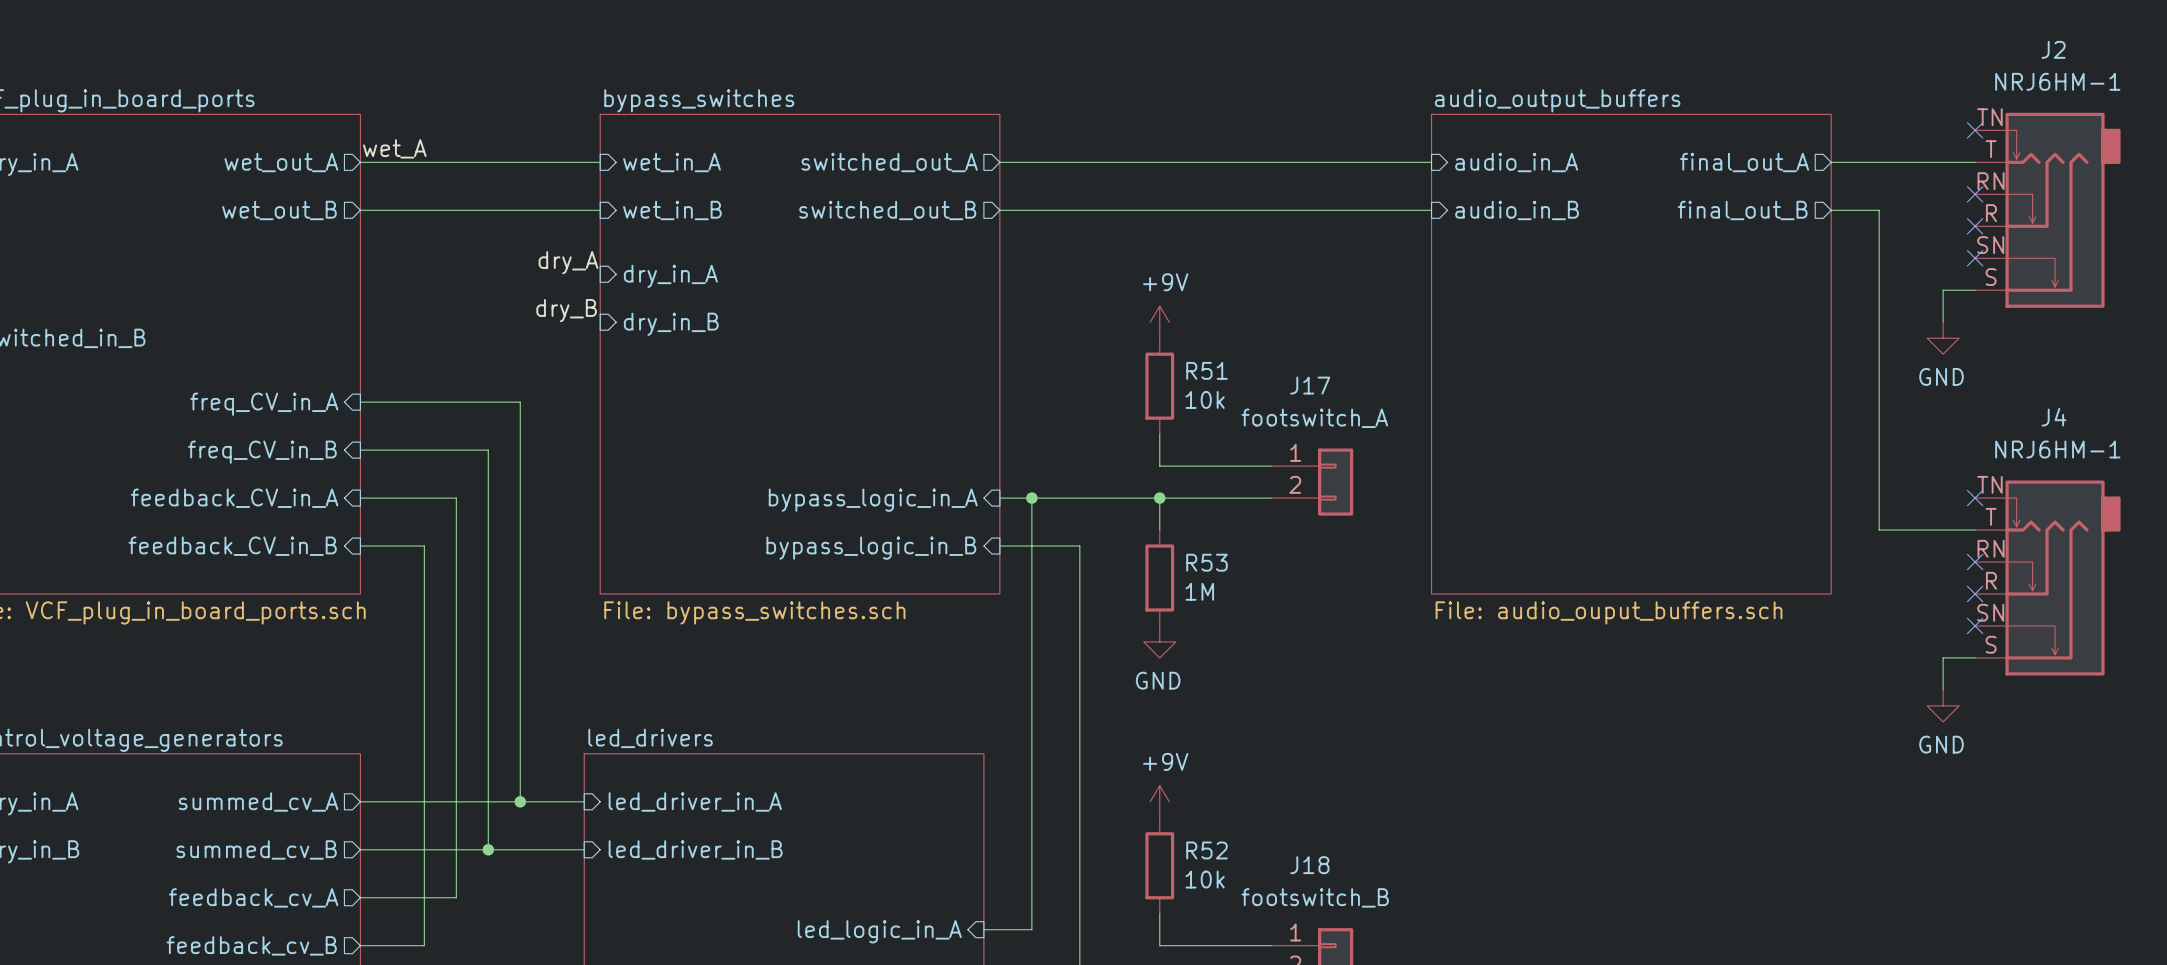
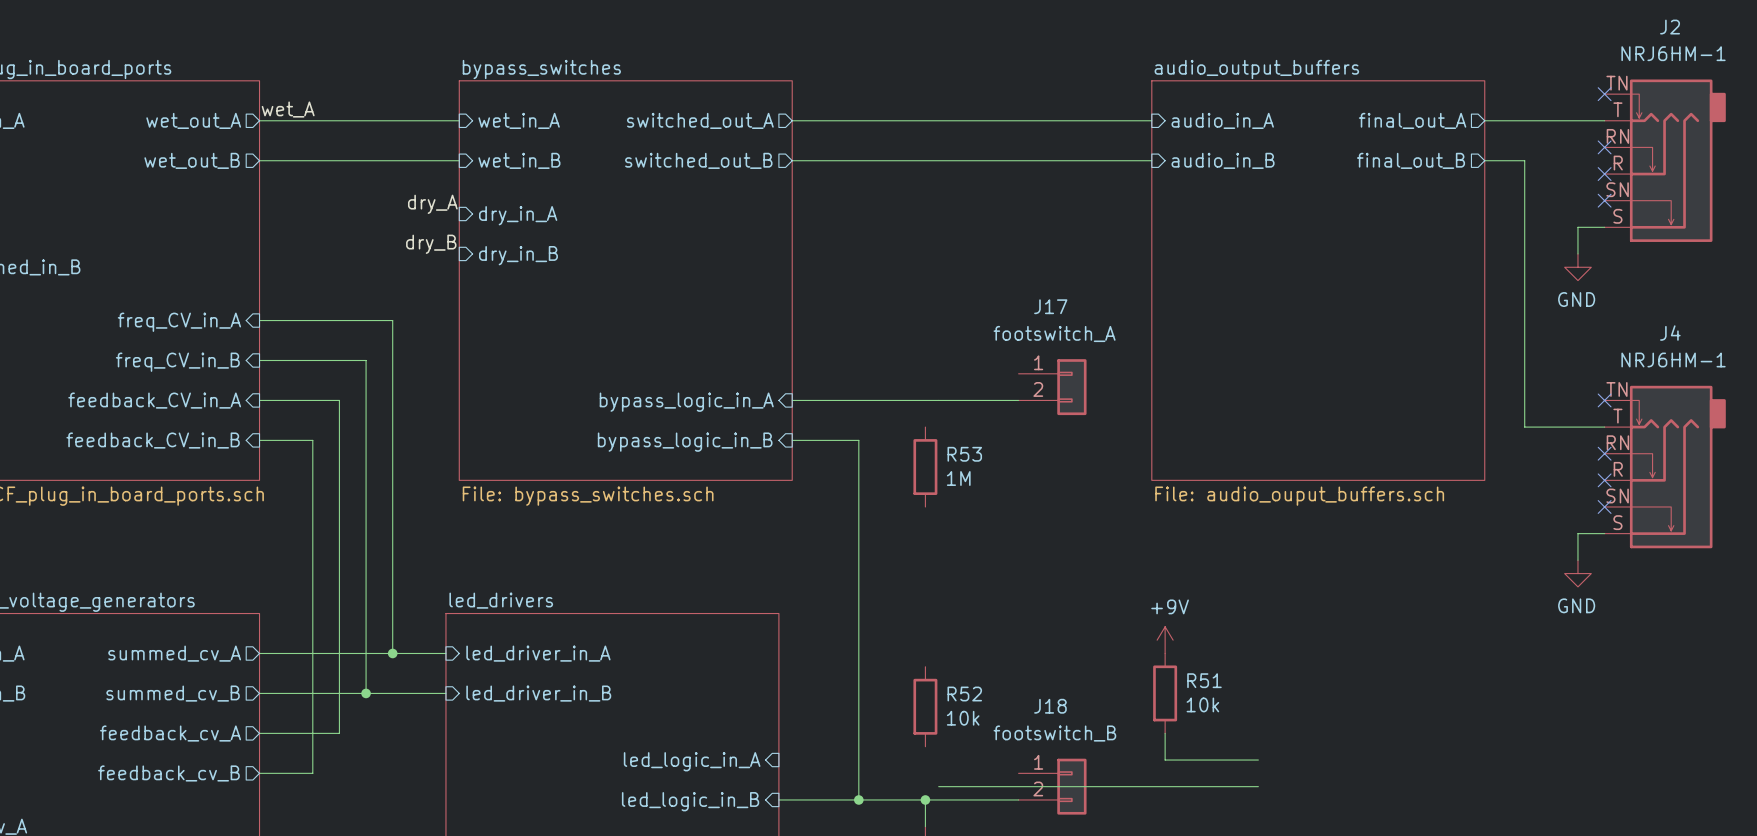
power symbol: +9V (1159, 322) -> none
R51 position: (1159, 386) -> (1165, 693)
wire: (1159, 434) (1159, 466) (1271, 466) -> none
wire: (1031, 498) (1031, 929) (983, 929) -> none
junction: (1031, 498) -> none
wire: (1159, 498) (1159, 530) -> none
junction: (1159, 498) -> none
power symbol: GND (1159, 641) -> none
power symbol: none -> +9V (1165, 640)
power symbol: +9V (1159, 801) -> none
wire: (1159, 913) (1159, 945) (1271, 945) -> (1165, 733) (1165, 760) (1258, 760)
wire: none -> (938, 786) (1258, 786)

